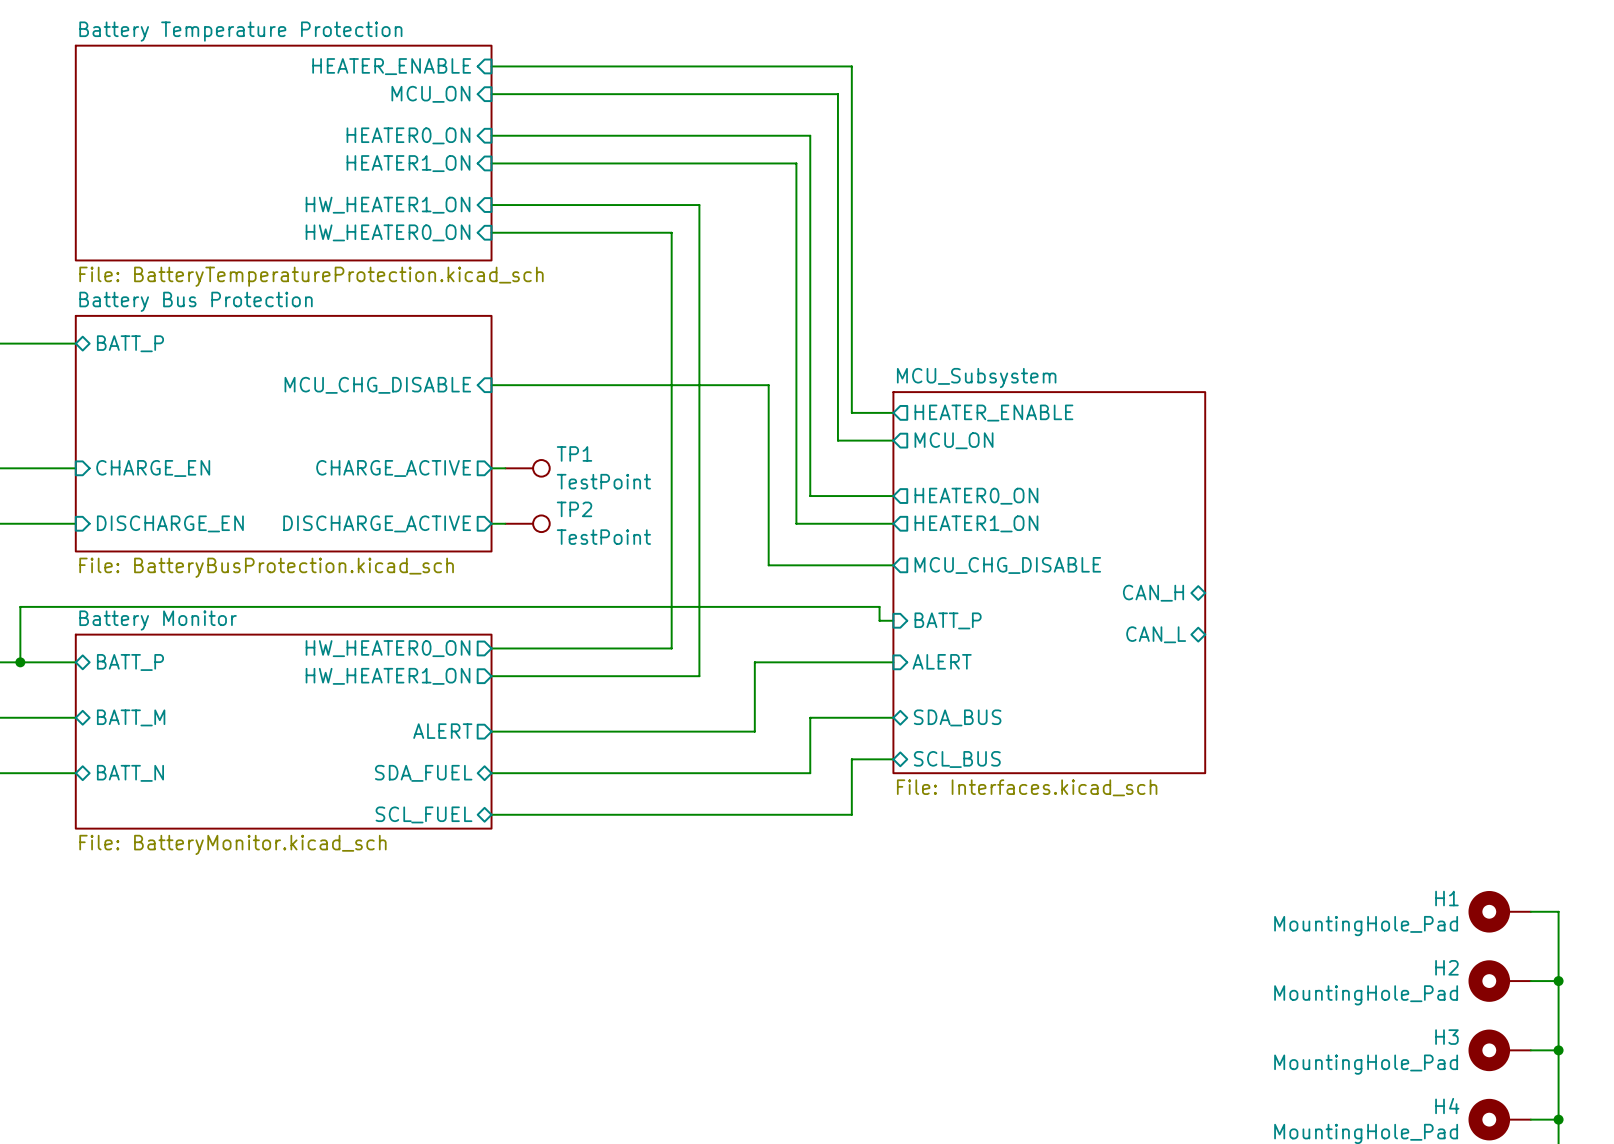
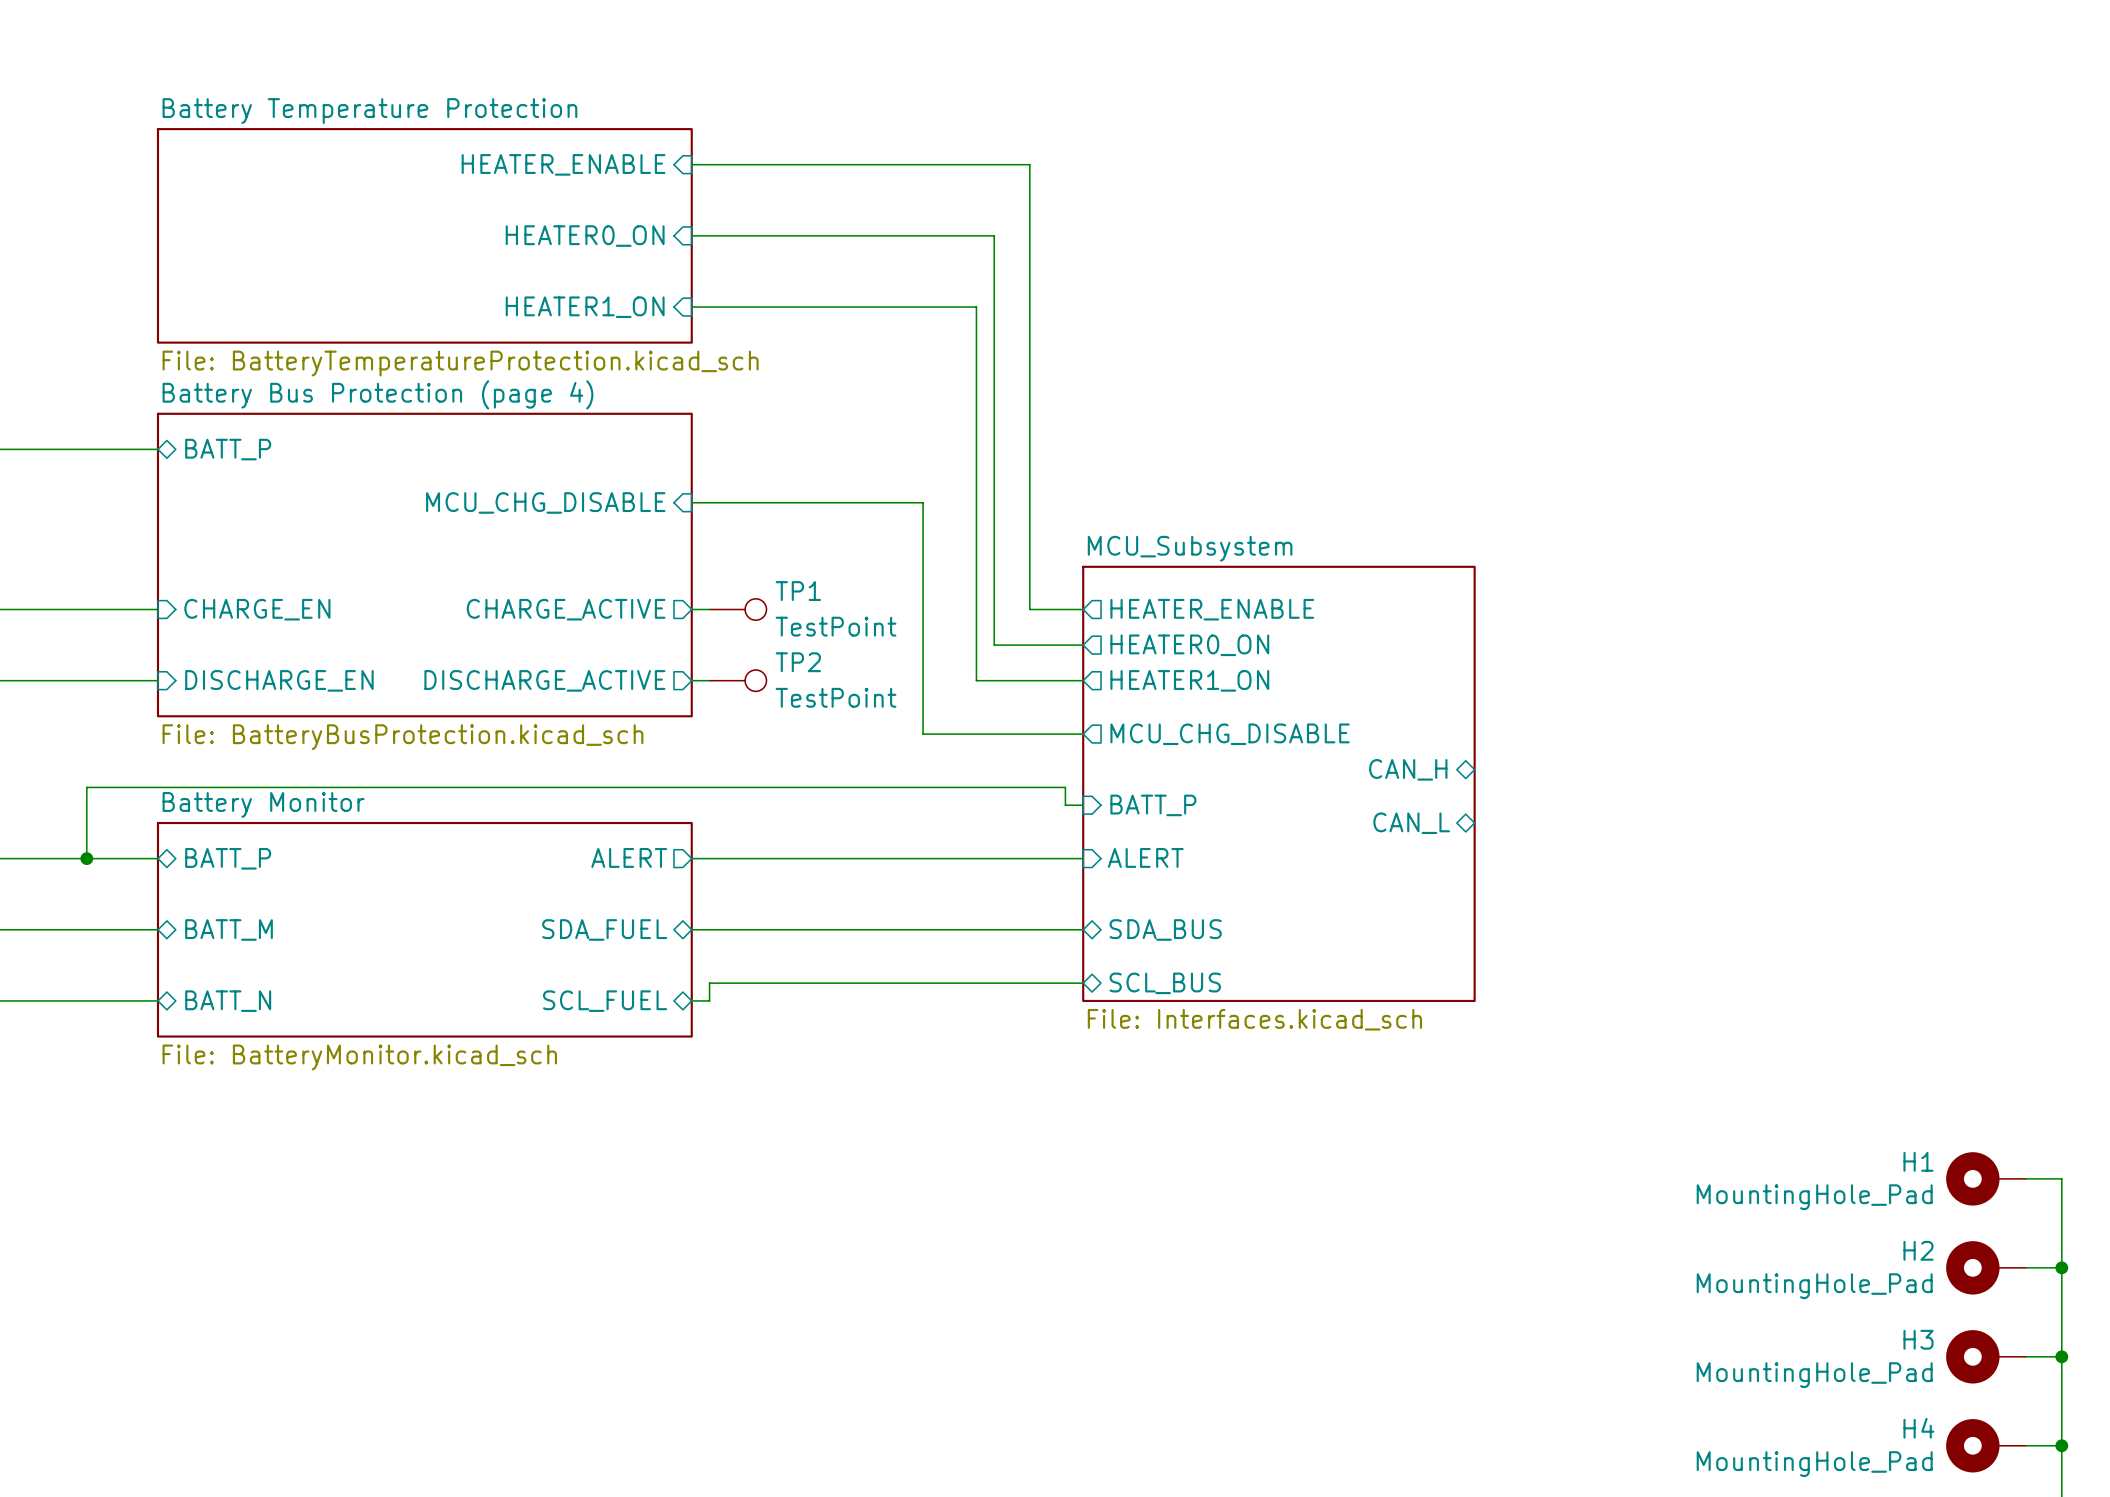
sheet pin position: HEATER_ENABLE (391, 66) -> HEATER_ENABLE (563, 164)
wire: (491, 66) (851, 66) (851, 412) (893, 412) -> none
sheet pin: MCU_ON (430, 94) -> none
wire: (491, 94) (837, 94) (837, 440) (893, 440) -> none
wire: none -> (691, 164) (1029, 164) (1029, 609) (1083, 609)
sheet pin position: HEATER0_ON (408, 135) -> HEATER0_ON (585, 236)
wire: (491, 135) (810, 135) (810, 496) (893, 496) -> none
sheet Battery Temperature Protection: File: BatteryTemperatureProtection.kicad_sch (283, 153) -> none
sheet pin: HEATER1_ON (408, 163) -> none
wire: (491, 163) (796, 163) (796, 523) (893, 523) -> none
sheet Battery Temperature Protection: none -> File: BatteryTemperatureProtection.kicad_sch (424, 235)
wire: none -> (691, 235) (994, 235) (994, 645) (1083, 645)
sheet pin: HW_HEATER1_ON (388, 205) -> none
wire: (491, 205) (699, 205) (699, 676) (491, 676) -> none
sheet pin: HW_HEATER0_ON (388, 232) -> HEATER1_ON (585, 307)
wire: (671, 232) (671, 385) (768, 385) (768, 565) -> (923, 307) (976, 307) (976, 680) (1083, 680)
sheet Battery Bus Protection name: Battery Bus Protection (196, 301) -> Battery Bus Protection (page 4) (377, 394)
sheet pin position: HEATER_ENABLE (993, 413) -> HEATER_ENABLE (1212, 609)
sheet pin: MCU_ON (954, 440) -> none
sheet pin position: HEATER0_ON (976, 496) -> HEATER0_ON (1189, 645)
sheet pin position: HEATER1_ON (976, 523) -> HEATER1_ON (1189, 680)
wire: (671, 565) (671, 648) (491, 648) -> (923, 734) (1047, 734)
wire: (796, 565) (893, 565) -> none
sheet pin position: MCU_CHG_DISABLE (1007, 565) -> MCU_CHG_DISABLE (1230, 734)
sheet MCU_Subsystem: File: Interfaces.kicad_sch (1049, 582) -> none
sheet pin position: CAN_H (1153, 593) -> CAN_H (1408, 769)
sheet MCU_Subsystem: none -> File: Interfaces.kicad_sch (1278, 783)
wire: (782, 606) (879, 606) (879, 620) (893, 620) -> (1065, 787) (1065, 805) (1083, 805)
sheet pin position: BATT_P (948, 620) -> BATT_P (1153, 805)
sheet pin position: CAN_L (1156, 634) -> CAN_L (1411, 823)
sheet pin: HW_HEATER0_ON (388, 648) -> none
sheet pin position: ALERT (942, 661) -> ALERT (1145, 857)
wire: (754, 662) (754, 731) (491, 731) -> (1029, 858) (691, 858)
wire: (796, 662) (893, 662) -> none
sheet pin: HW_HEATER1_ON (388, 676) -> none
sheet Battery Monitor: none -> File: BatteryMonitor.kicad_sch (424, 929)
sheet pin: none -> SDA_FUEL (604, 929)
wire: none -> (691, 929) (1083, 929)
wire: (893, 717) (810, 717) (810, 773) (505, 773) -> (1083, 983) (709, 983) (709, 1000)
sheet pin position: SDA_BUS (957, 717) -> SDA_BUS (1165, 929)
sheet Battery Monitor: File: BatteryMonitor.kicad_sch (283, 731) -> none
sheet pin position: ALERT (442, 731) -> ALERT (629, 857)
wire: (893, 759) (851, 759) (851, 814) (491, 814) -> none
sheet pin position: SCL_BUS (957, 759) -> SCL_BUS (1165, 983)
sheet pin: SDA_FUEL (423, 773) -> SCL_FUEL (605, 1001)
sheet pin: SCL_FUEL (424, 814) -> none

